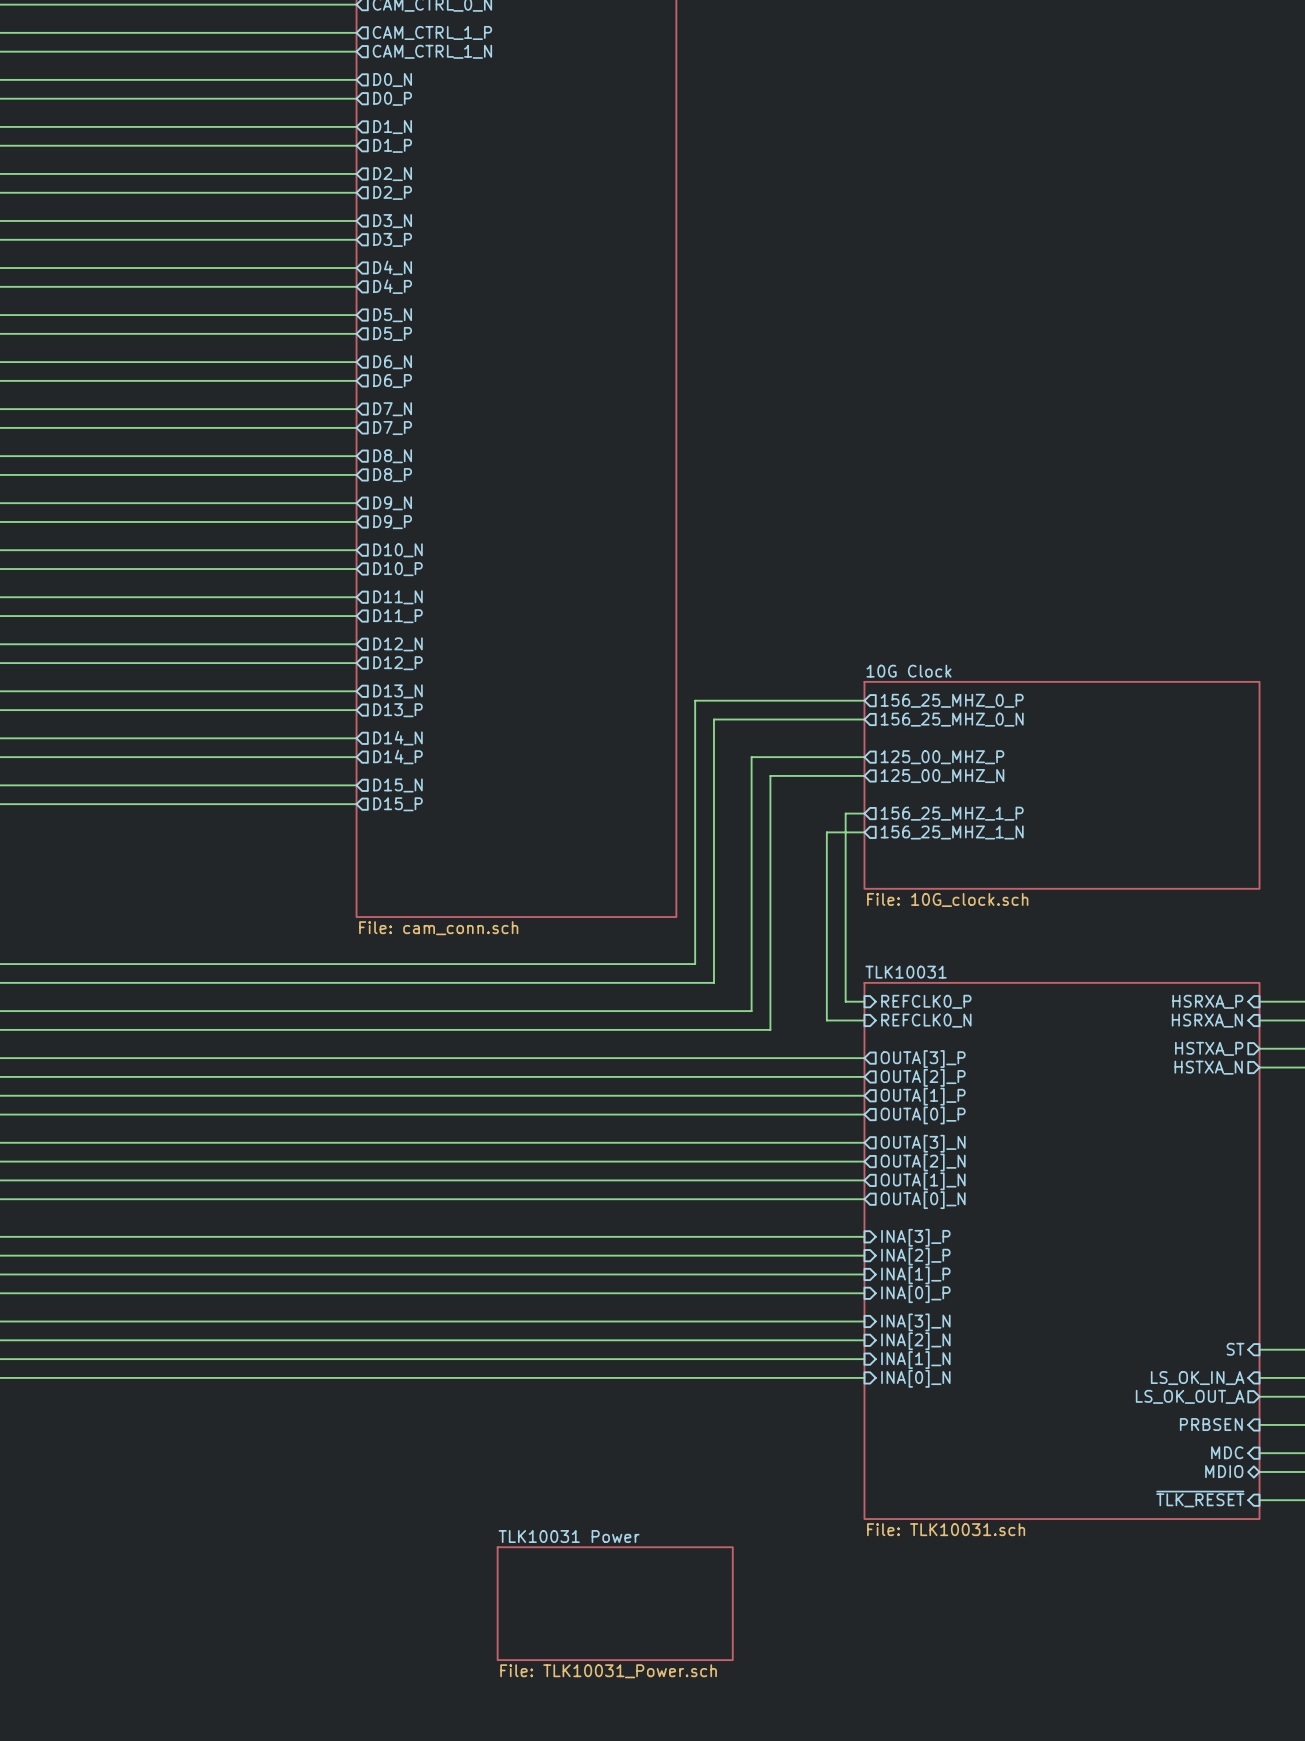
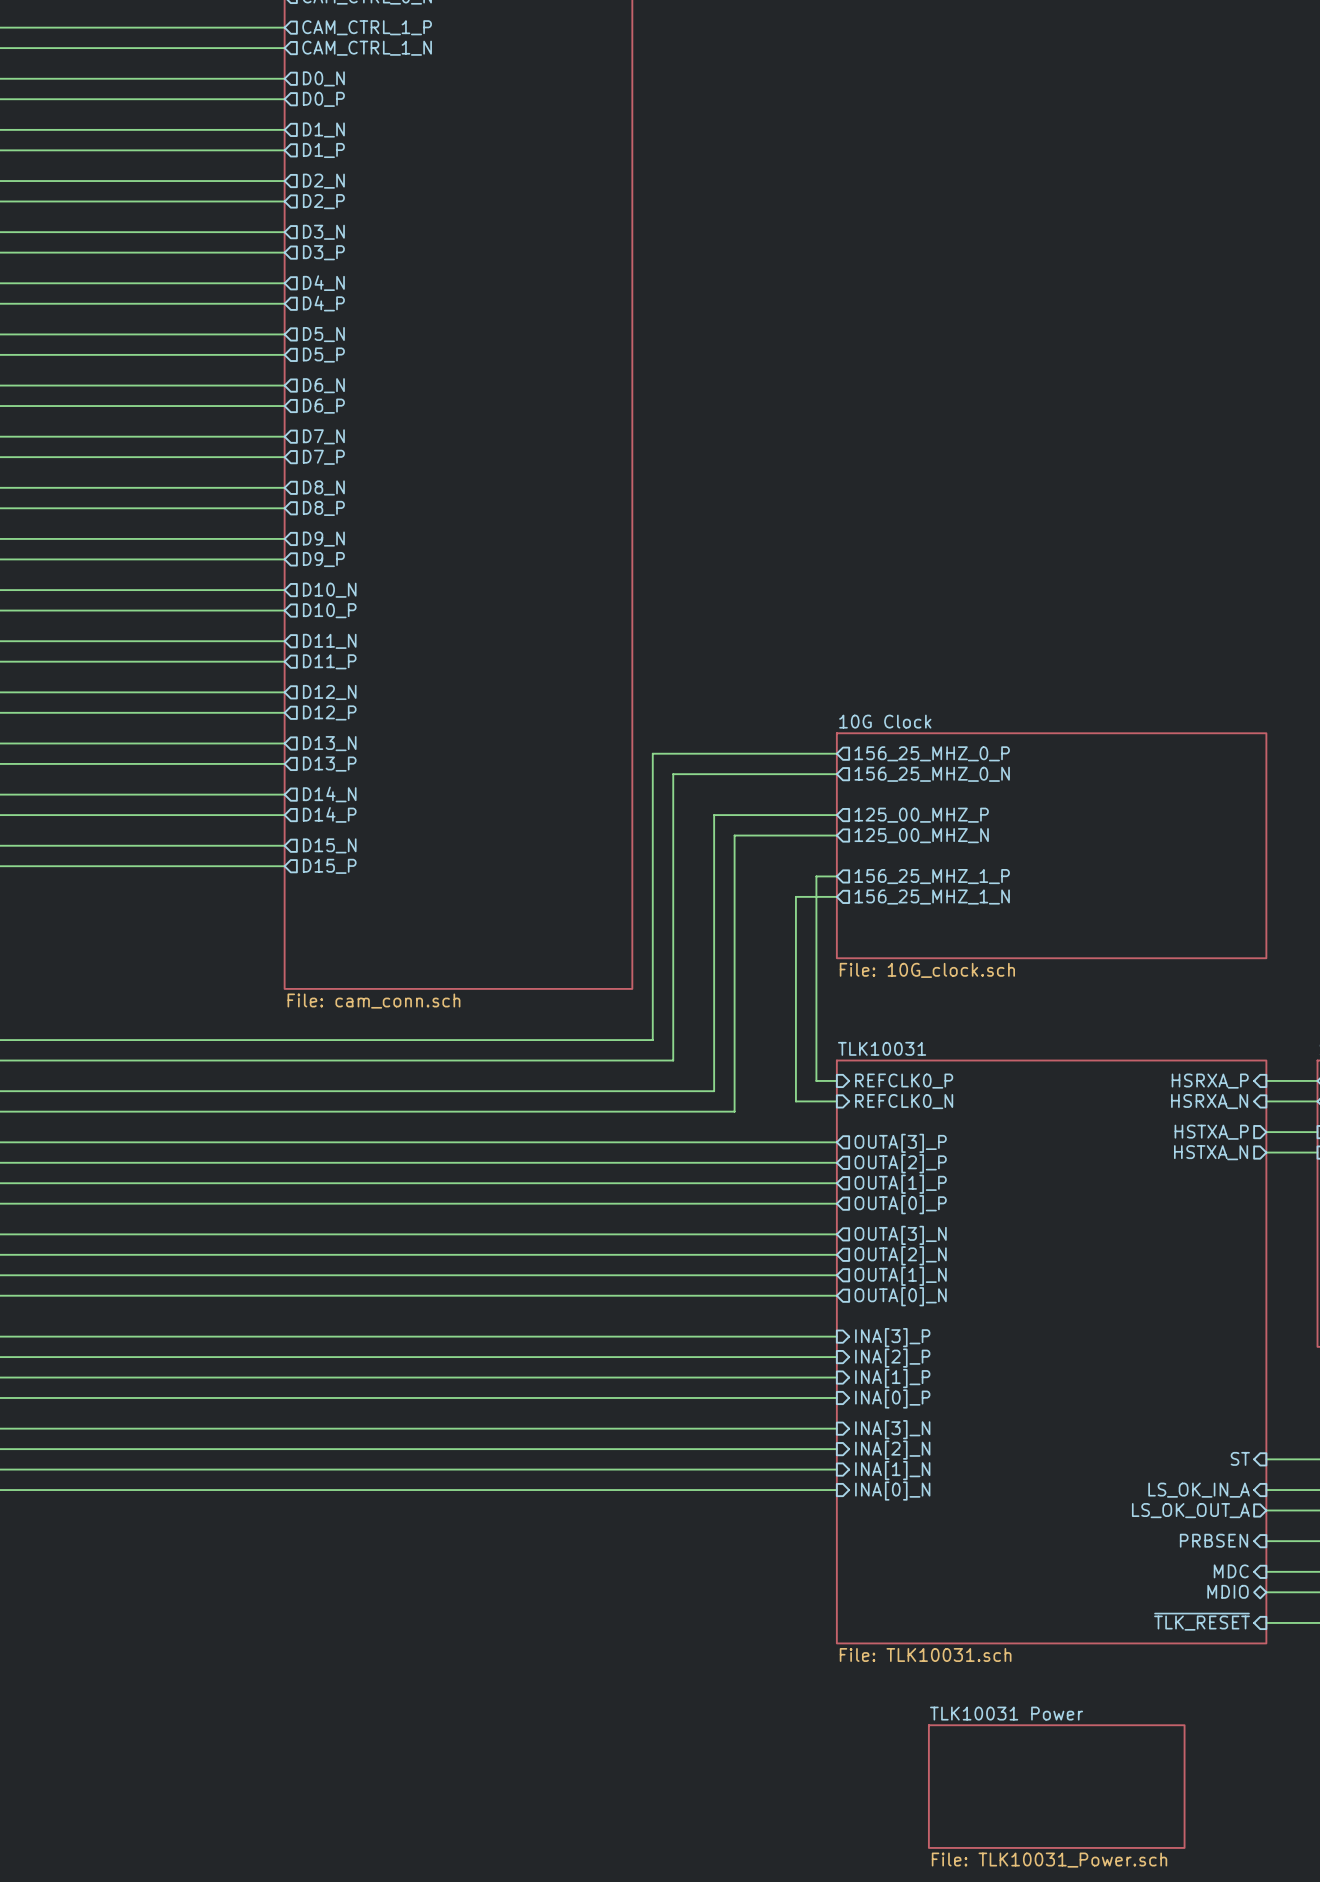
sheet TLK10031 Power position: (615, 1603) -> (1056, 1786)

